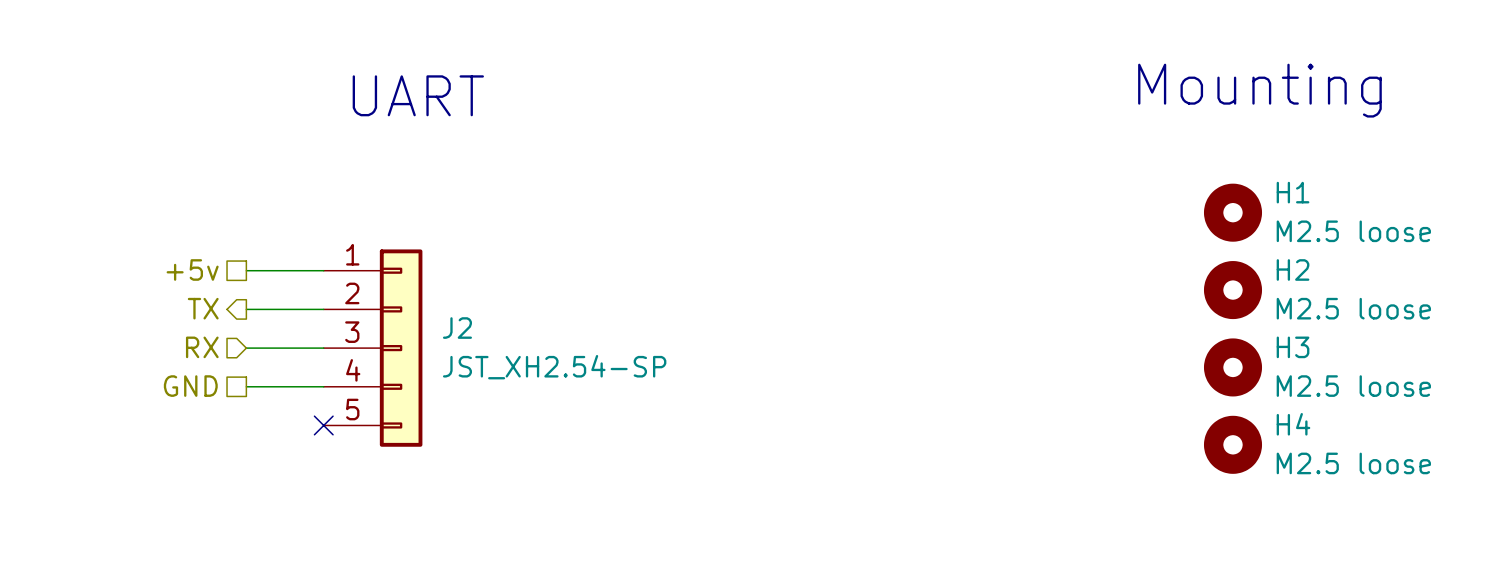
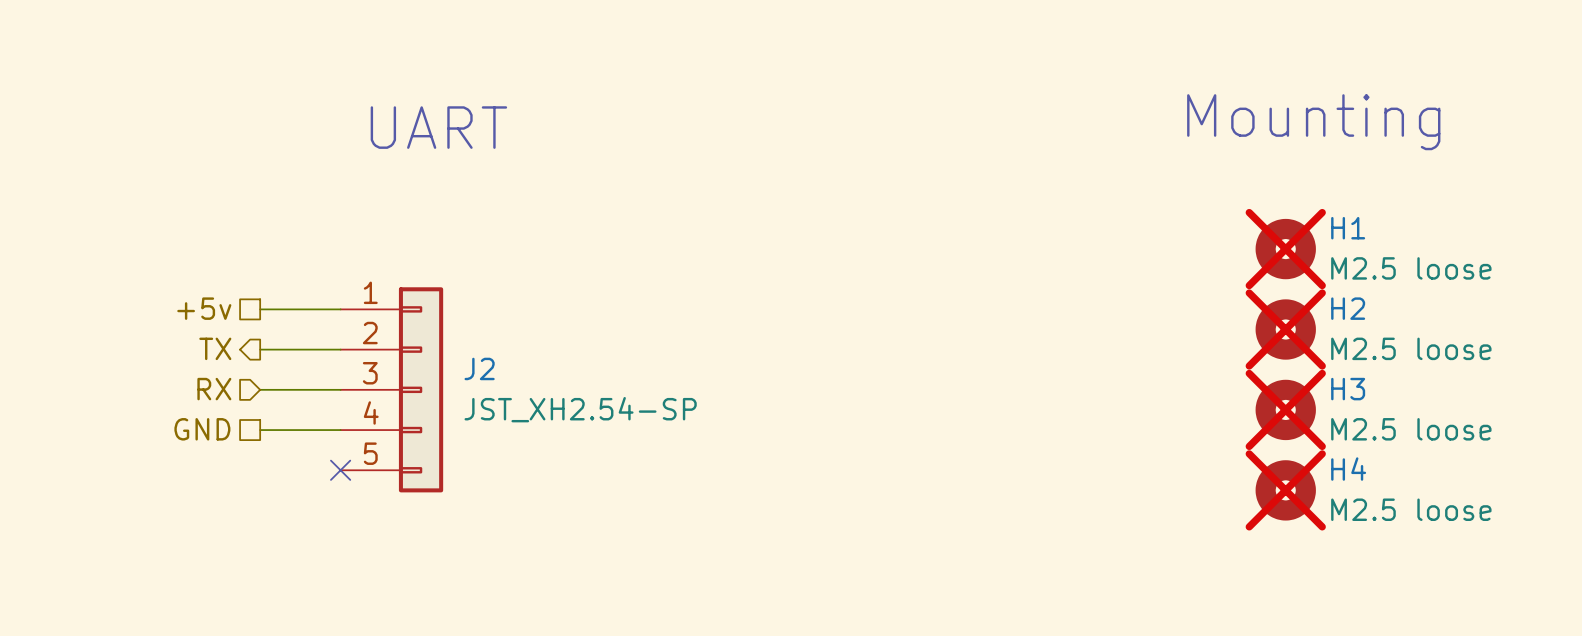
H1 do-not-place cross: none -> (1285, 249)
H2 do-not-place cross: none -> (1285, 329)
H3 do-not-place cross: none -> (1285, 409)
H4 do-not-place cross: none -> (1285, 490)

